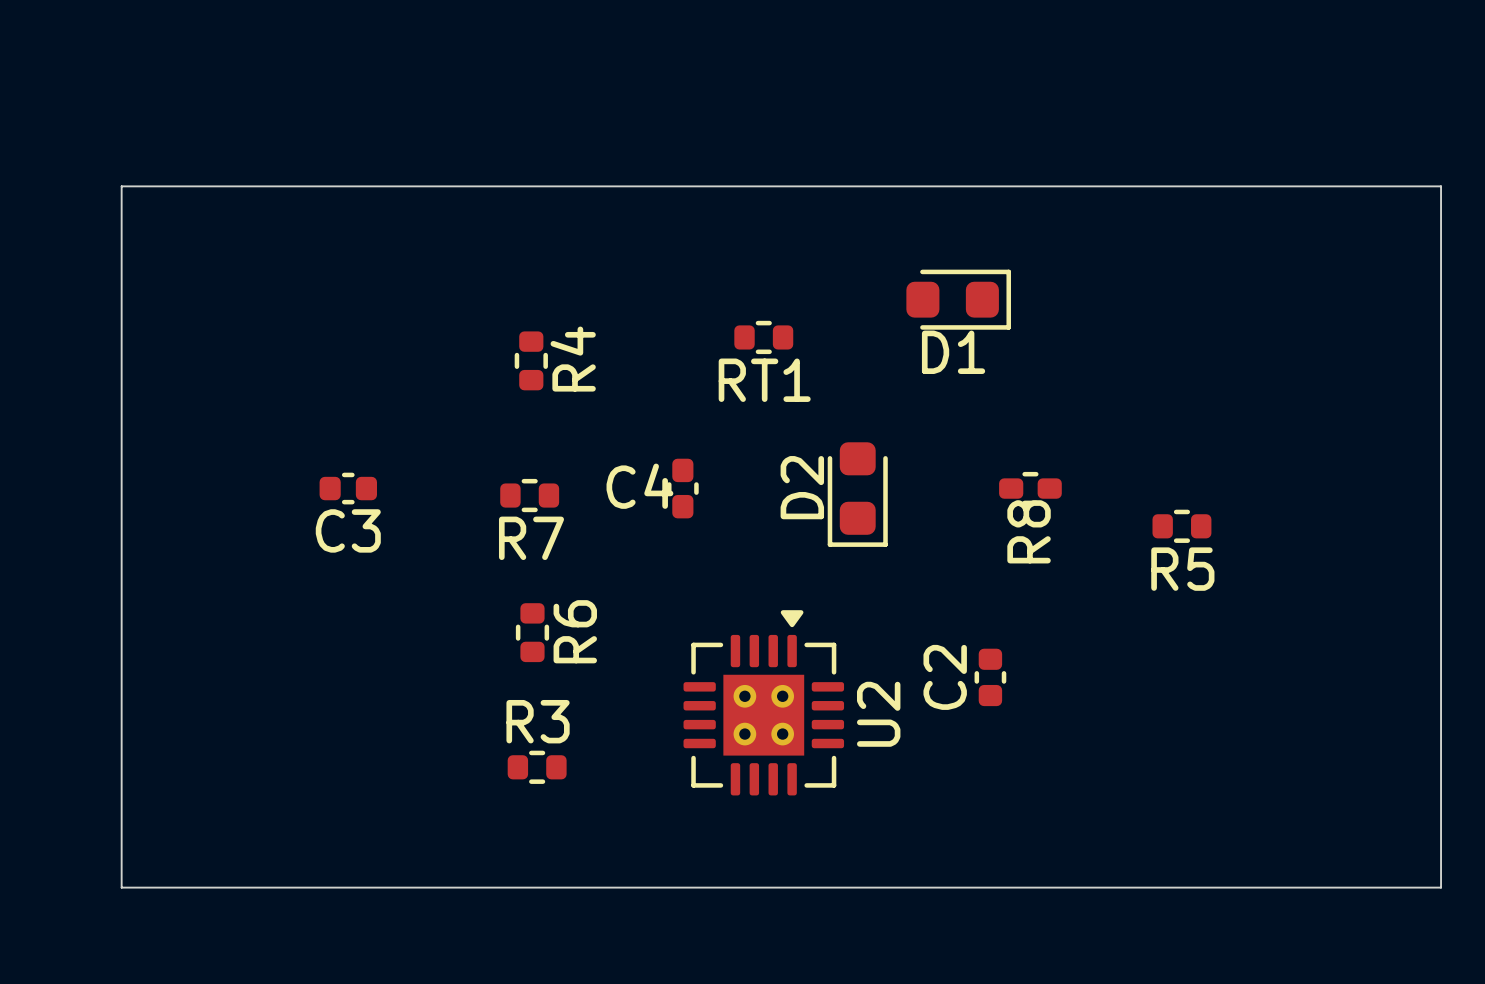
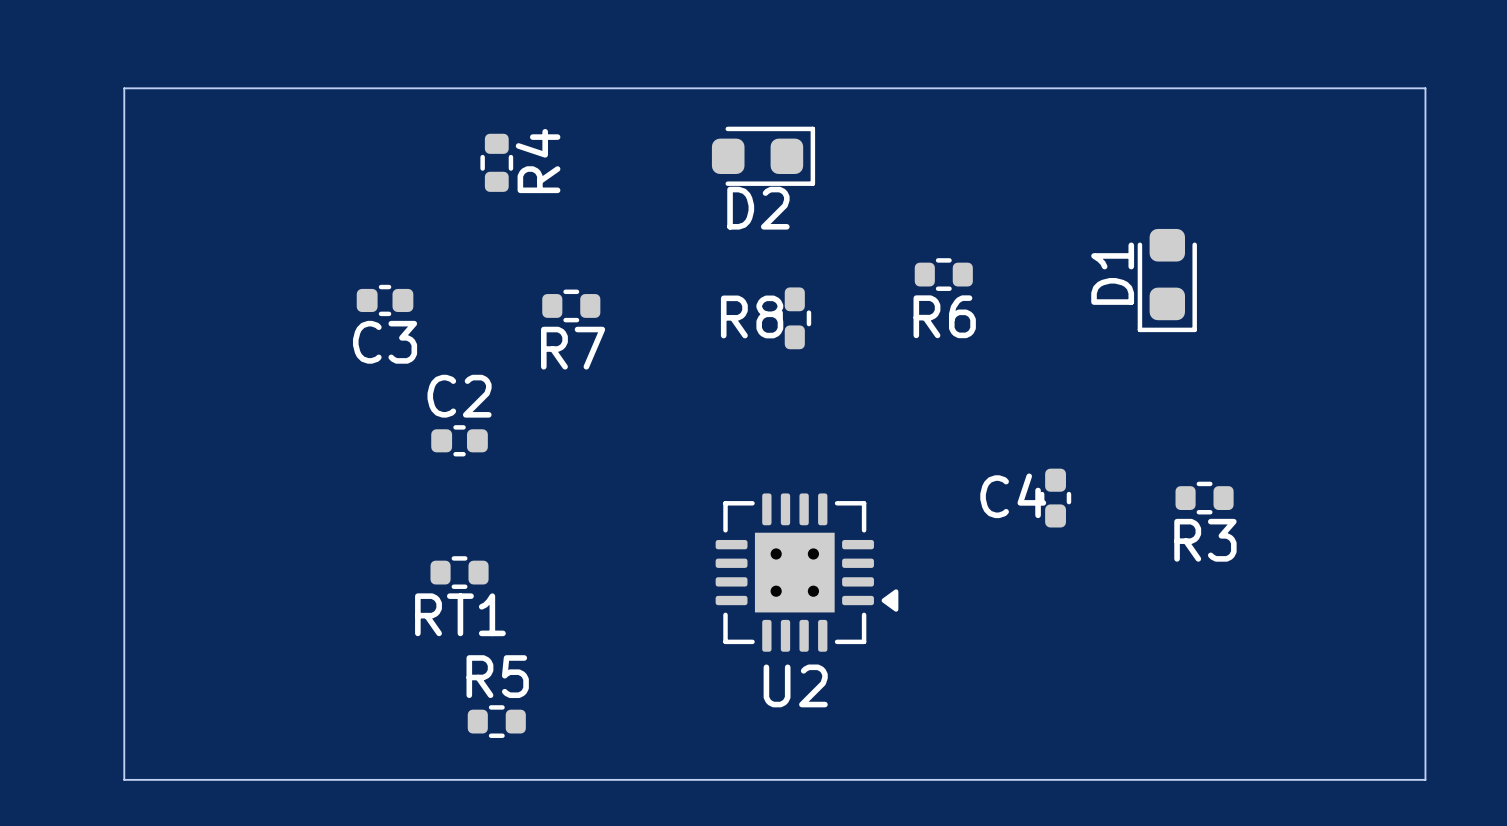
D1 rotation: 0° (958, 299) -> 90° clockwise (1167, 280)
D1 position: (958, 299) -> (1167, 280)
RT1 position: (763, 337) -> (459, 572)
R4 position: (531, 360) -> (496, 162)
C3 position: (348, 488) -> (385, 300)
C4 position: (682, 488) -> (1055, 498)
R8 rotation: 0° (1030, 488) -> 90° clockwise (794, 318)
R8 position: (1030, 488) -> (794, 318)
D2 rotation: 0° (857, 494) -> 90° counterclockwise (763, 156)
D2 position: (857, 494) -> (763, 156)
R7 position: (529, 495) -> (571, 305)
R5 position: (1181, 526) -> (496, 721)
R5 name position: R5 (1182, 569) -> R5 (497, 676)
R6 rotation: 0° (532, 632) -> 90° clockwise (943, 274)
R6 position: (532, 632) -> (943, 274)
C2 rotation: 0° (990, 677) -> 90° clockwise (459, 440)
C2 position: (990, 677) -> (459, 440)
U2 rotation: 0° (763, 702) -> 90° clockwise (807, 572)
R3 name position: R3 (538, 721) -> R3 (1205, 540)
R3 position: (537, 767) -> (1204, 498)

